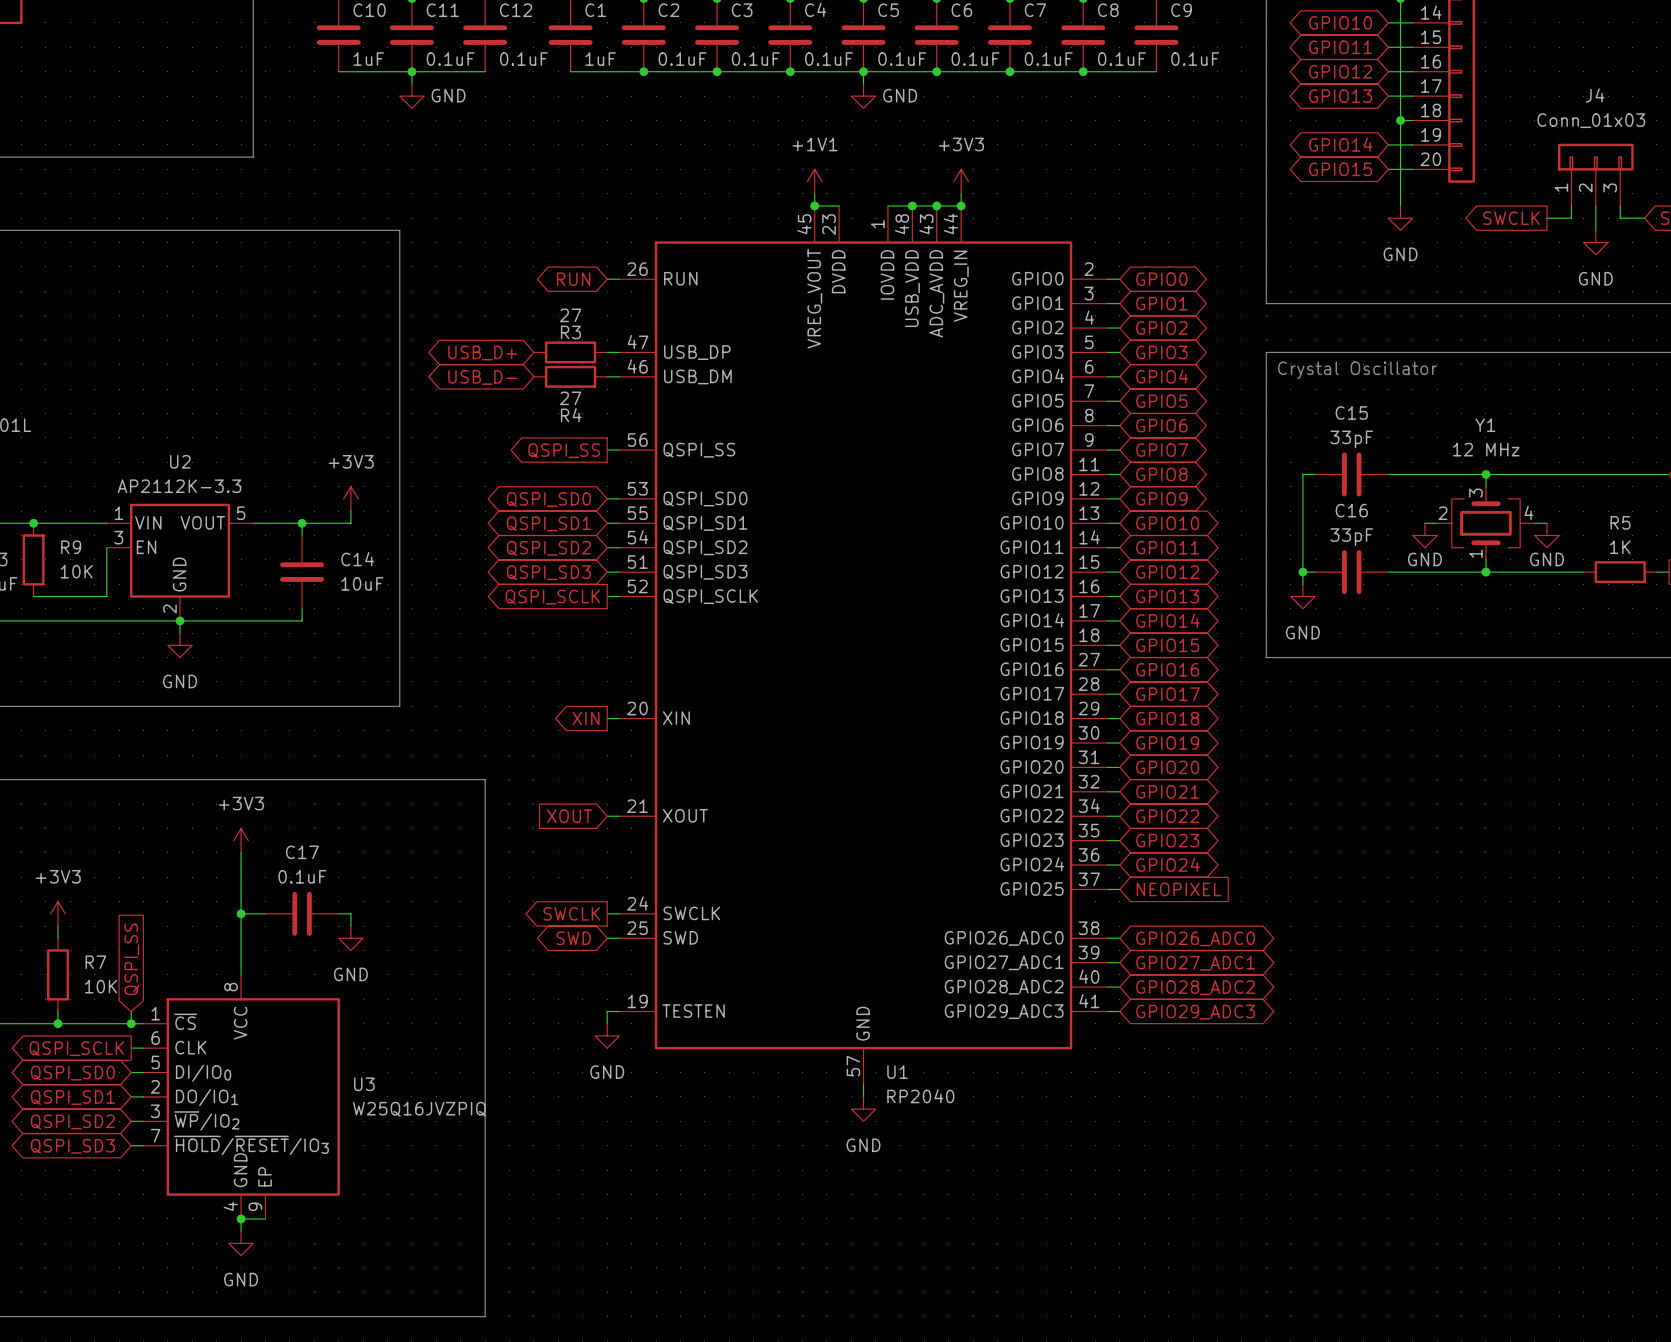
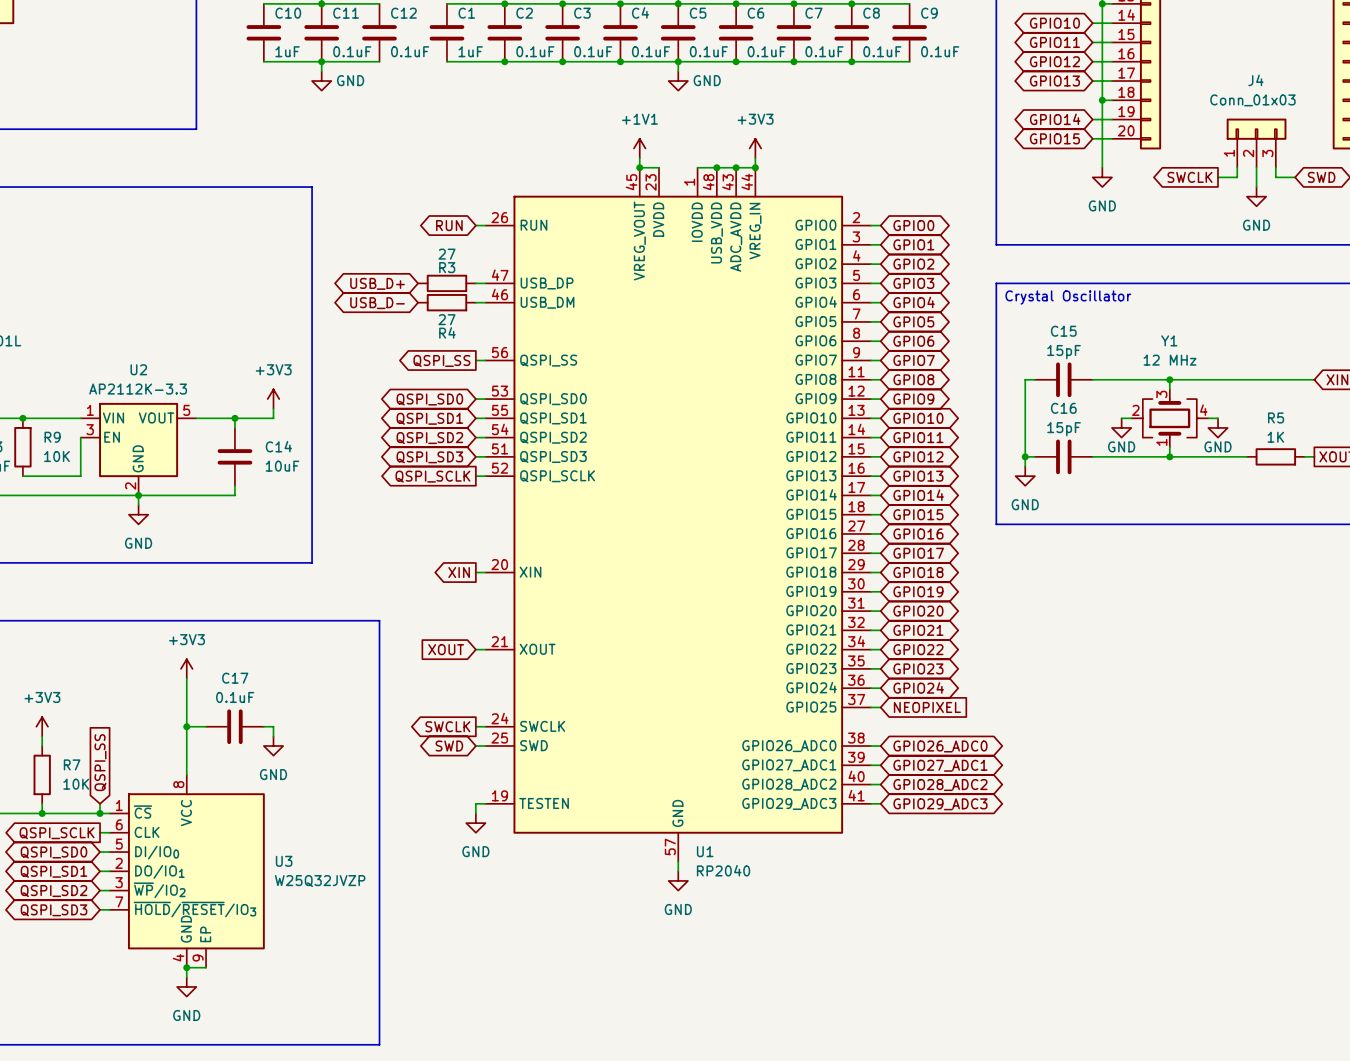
C15 value: 33pF (1351, 439) -> 15pF (1064, 352)
C16 value: 33pF (1351, 537) -> 15pF (1064, 429)
U3 value: W25Q16JVZPIQ (419, 1109) -> W25Q32JVZP (320, 881)

